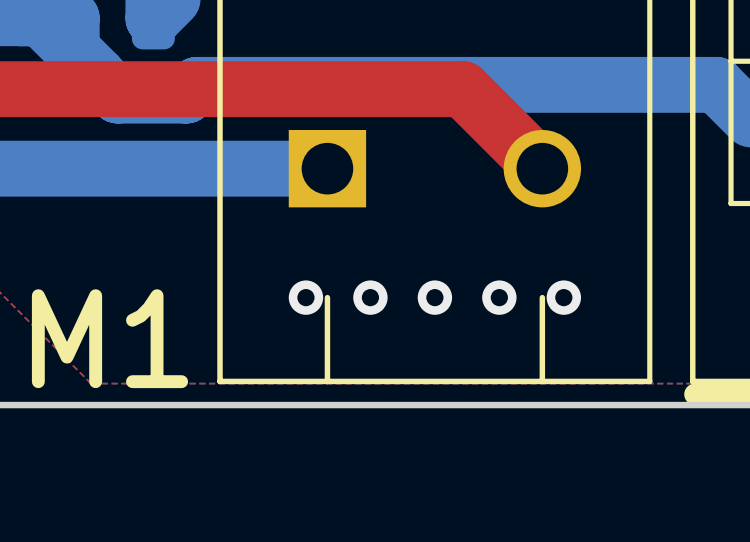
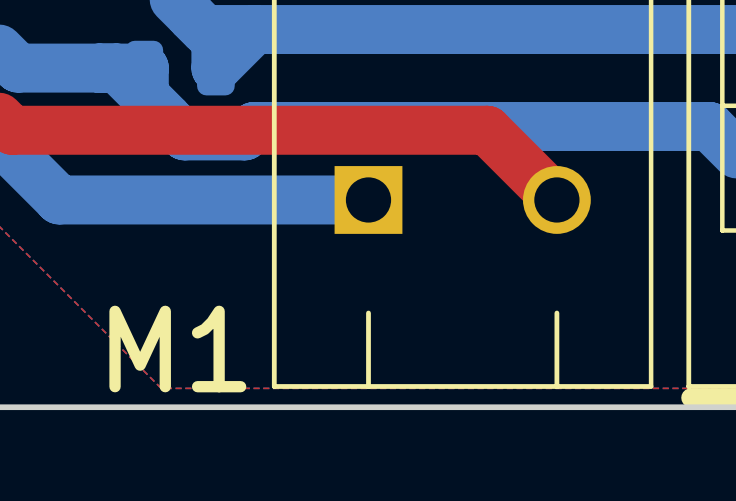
via: (305, 297) -> none
via: (370, 297) -> none
via: (434, 297) -> none
via: (499, 297) -> none
via: (563, 297) -> none

